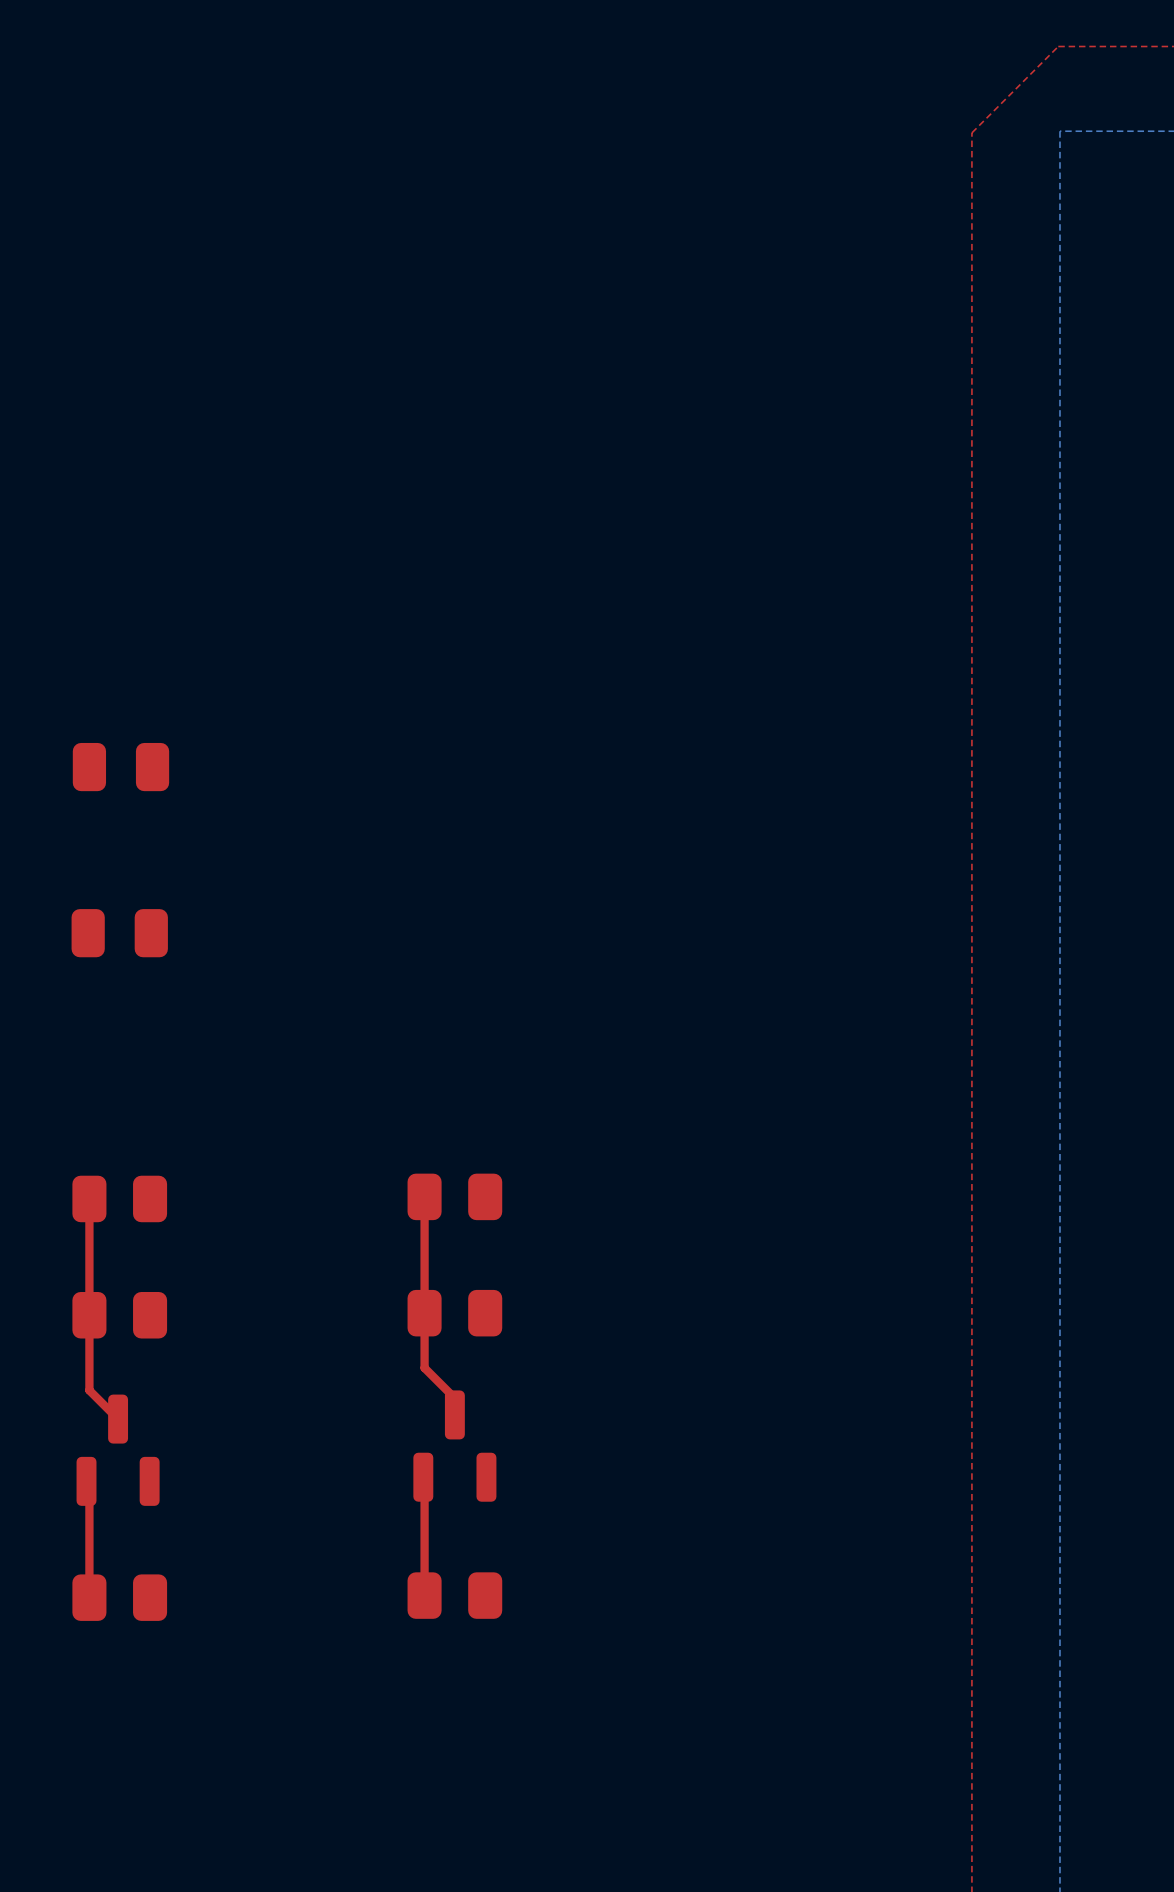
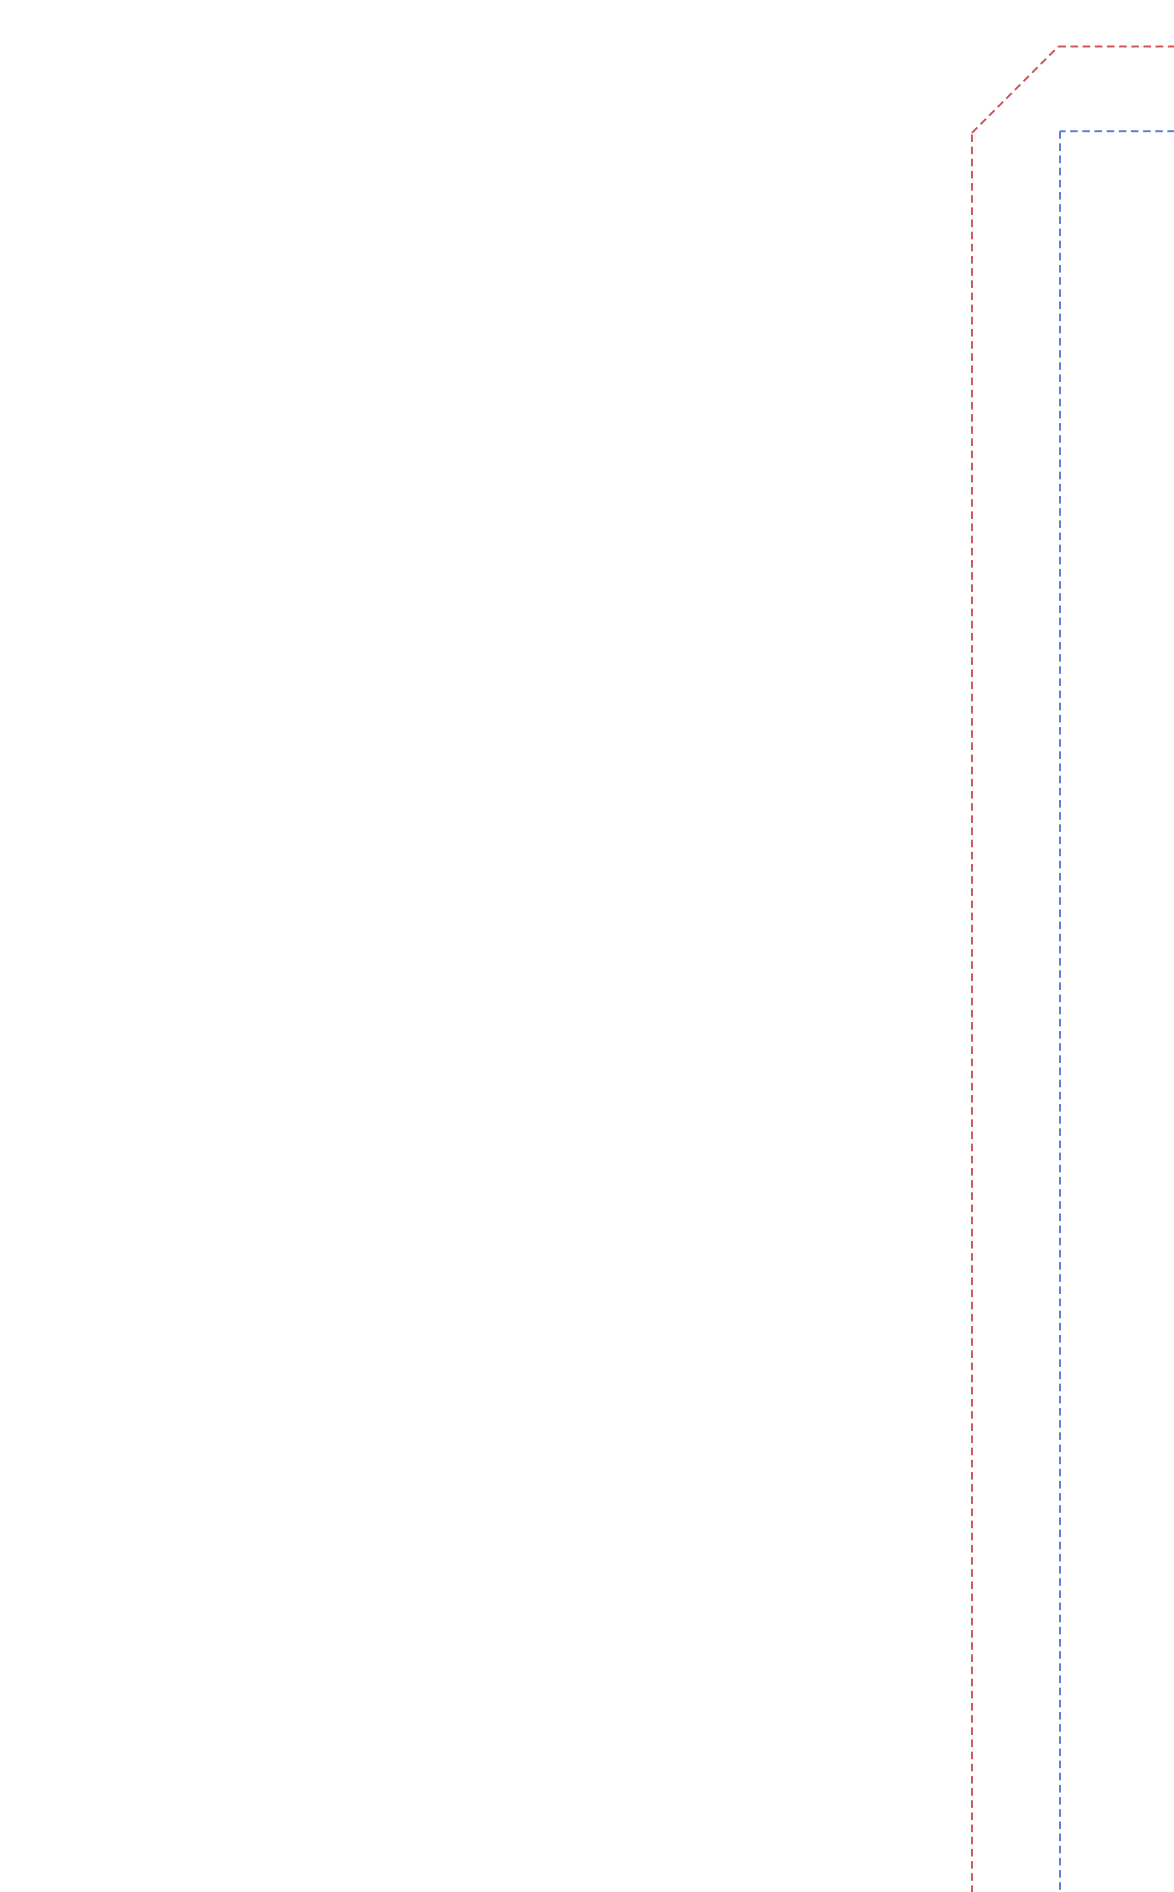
part: (120, 767) -> none
part: (119, 933) -> none
top track: (424, 1196) (424, 1367) (454, 1398) (454, 1414) -> none
part: (454, 1196) -> none
top track: (89, 1198) (89, 1390) (118, 1419) -> none
part: (119, 1198) -> none
part: (454, 1313) -> none
part: (119, 1315) -> none
part: (454, 1446) -> none
part: (118, 1450) -> none
top track: (423, 1477) (424, 1595) -> none
top track: (86, 1481) (89, 1484) (89, 1597) -> none
part: (454, 1595) -> none
part: (119, 1597) -> none

